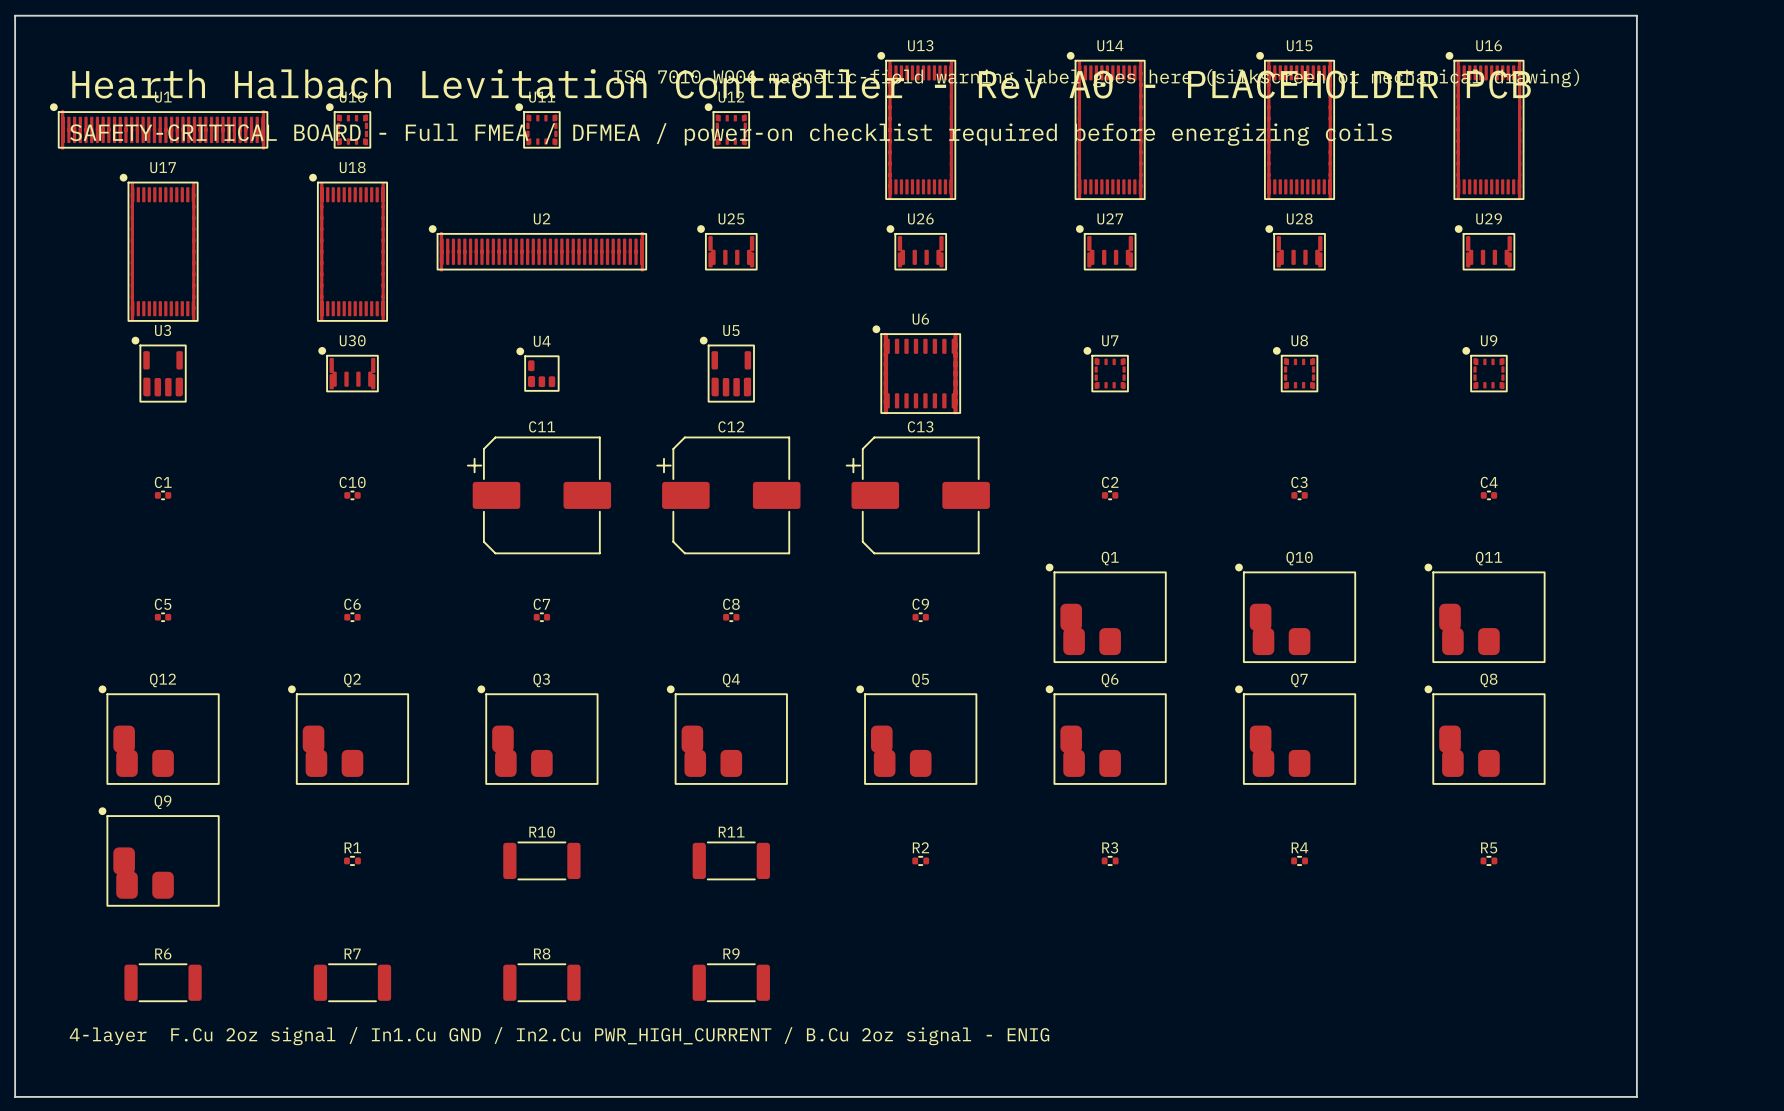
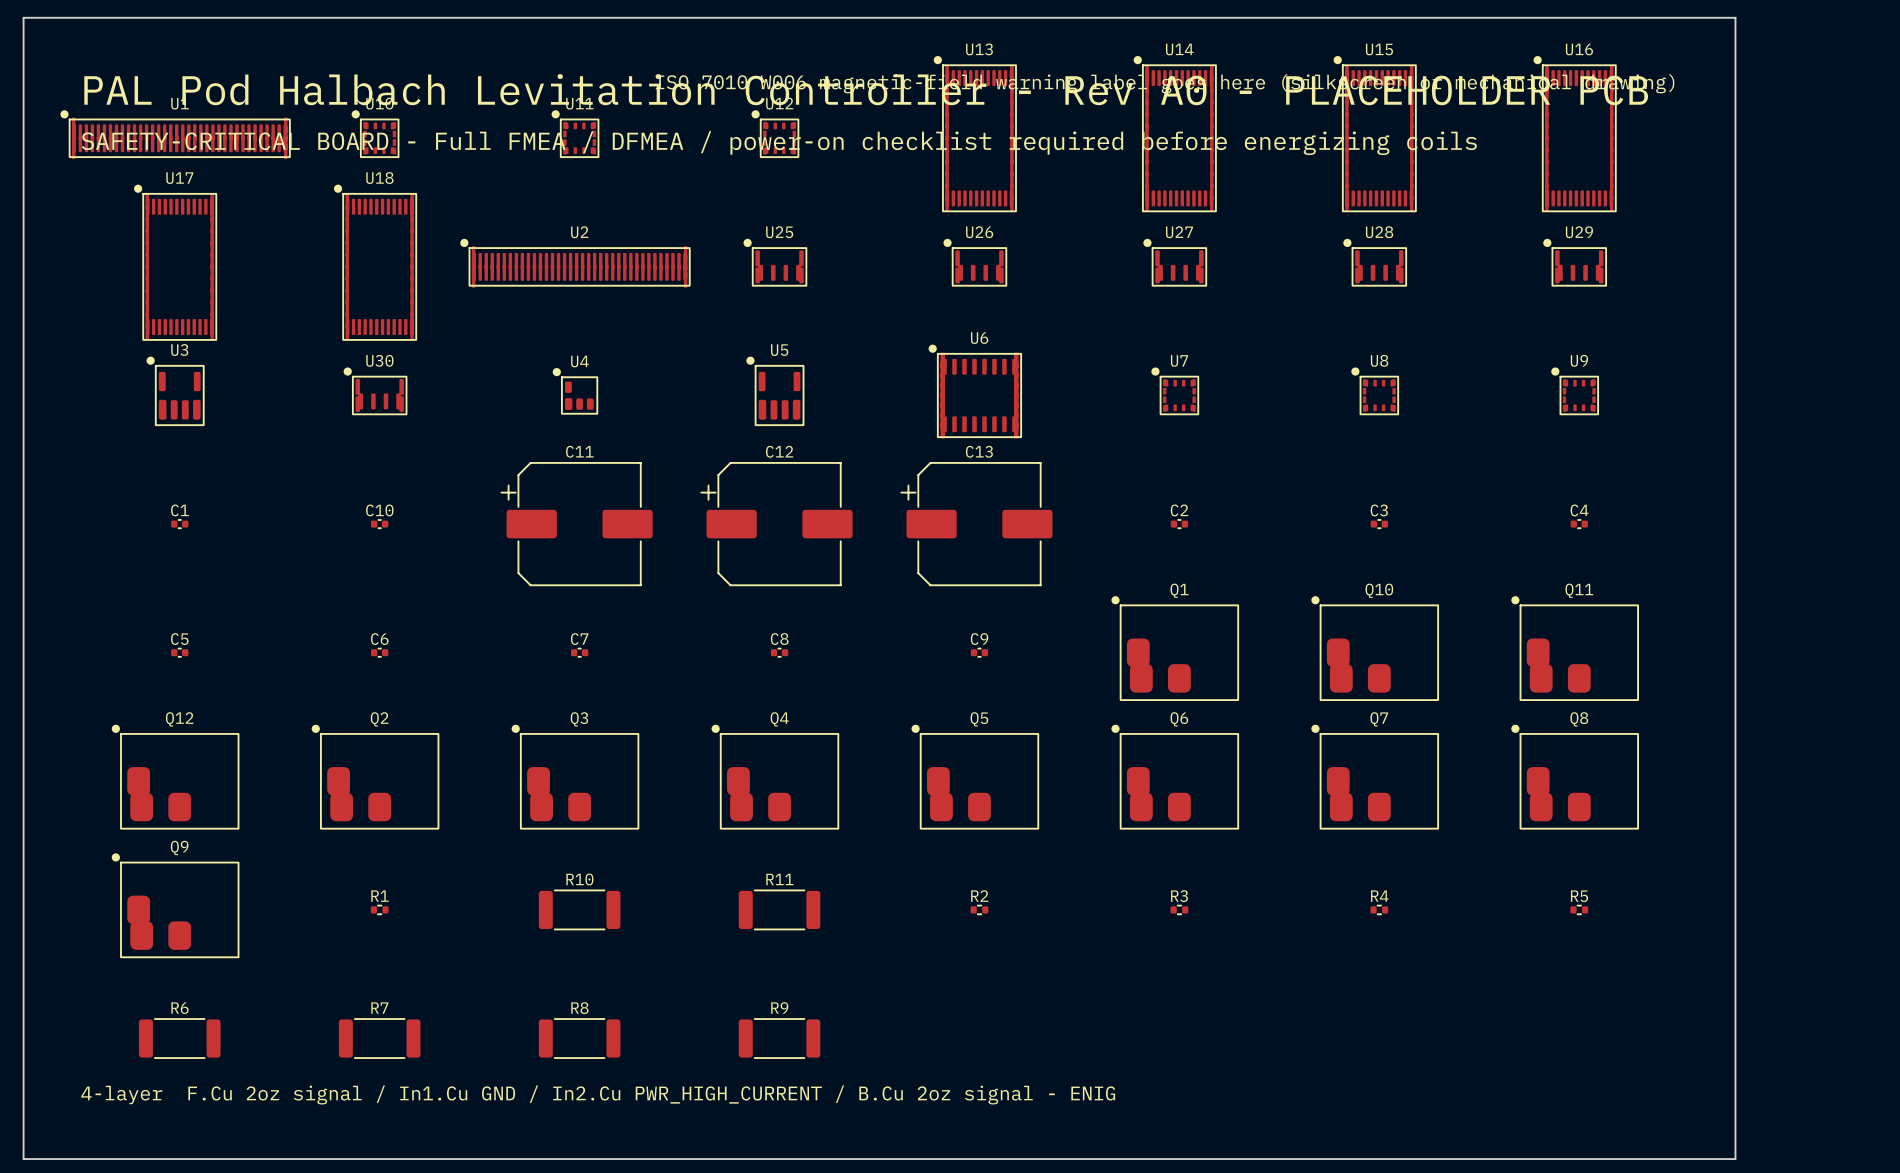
text: Hearth Halbach Levitation Controller - Rev A0 - PLACEHOLDER PCB (801, 83) -> PAL Pod Halbach Levitation Controller - Rev A0 - PLACEHOLDER PCB (866, 89)

